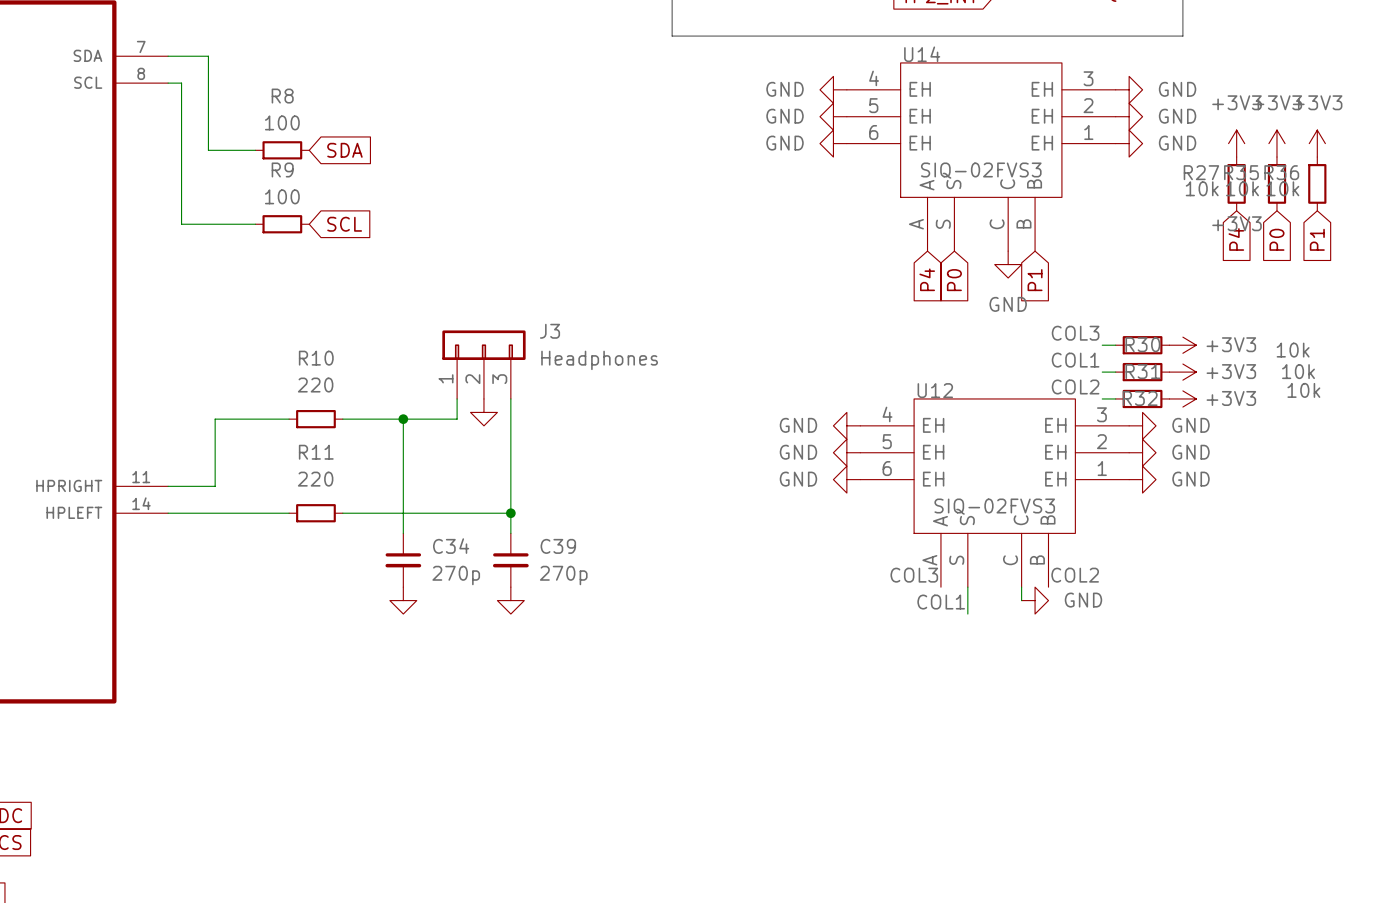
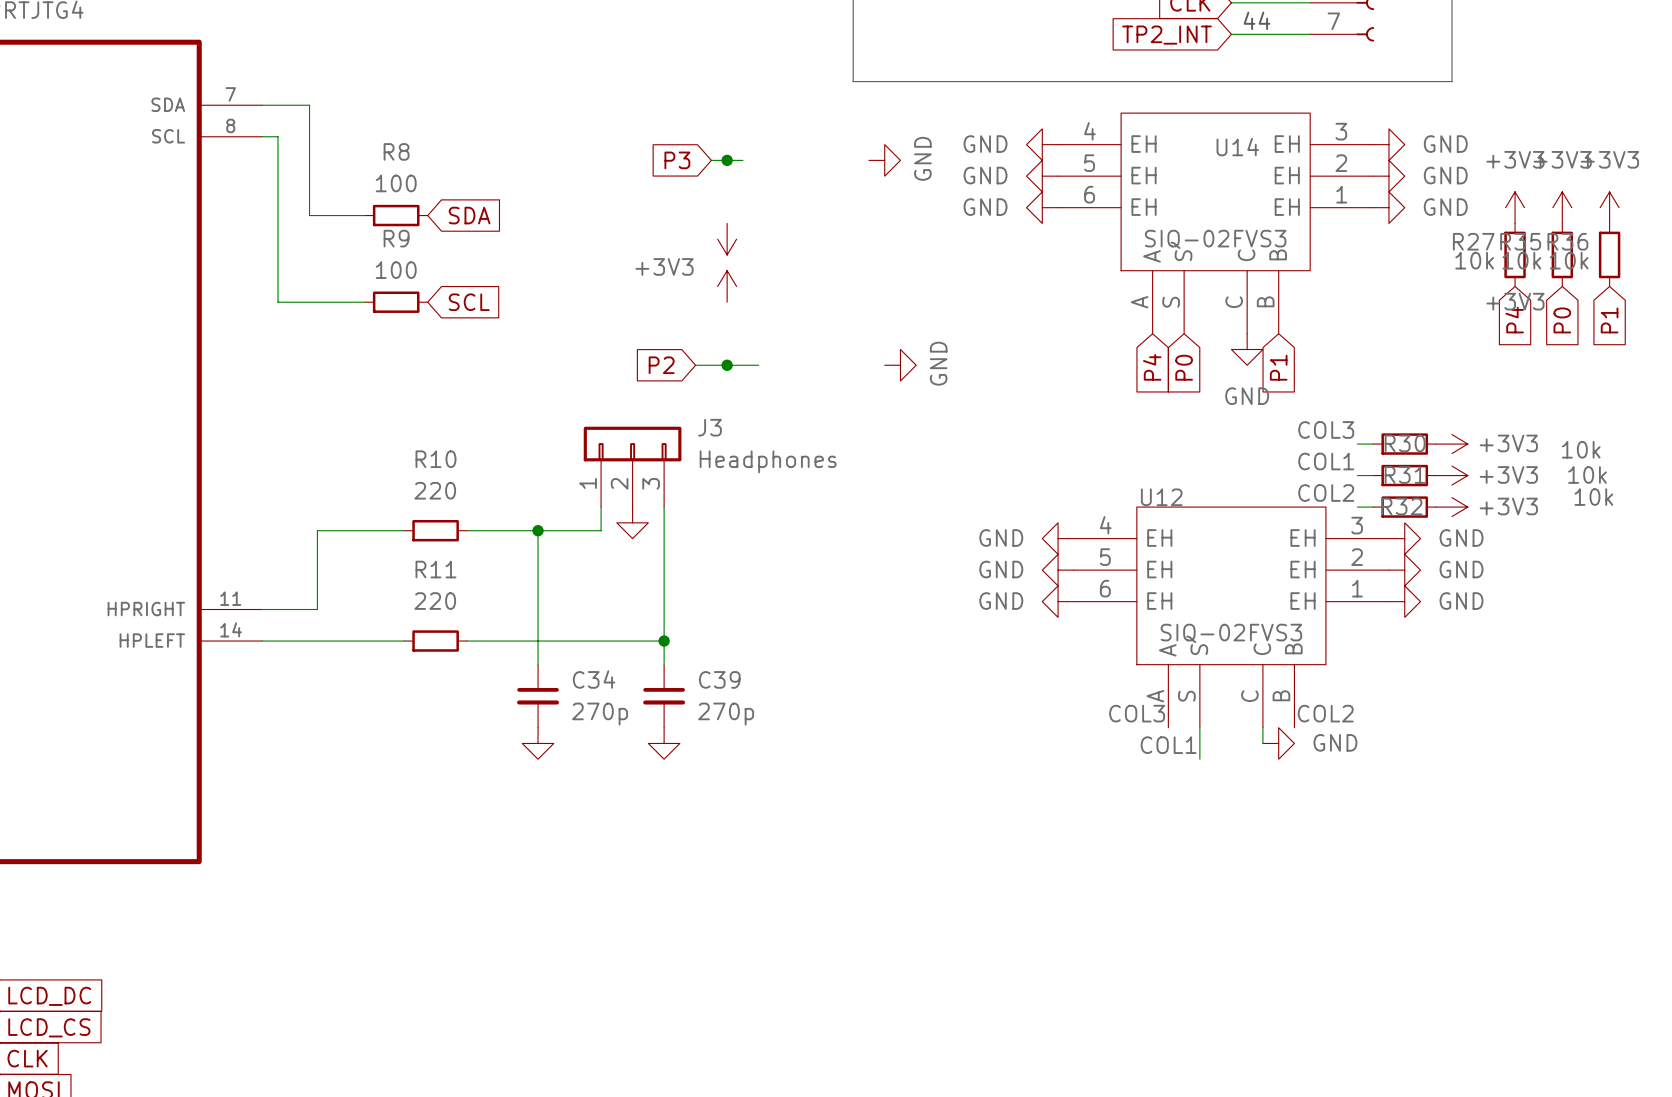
U14 name position: U14 (922, 54) -> U14 (1237, 147)
global label: none -> P3 (677, 160)
wire: none -> (711, 160) (742, 160)
junction: none -> (727, 160)
power symbol: none -> GND (884, 160)
power symbol: none -> (727, 239)
power symbol: none -> +3V3 (727, 286)
global label: none -> P2 (661, 365)
wire: none -> (695, 365) (758, 365)
junction: none -> (727, 365)
power symbol: none -> GND (900, 365)

